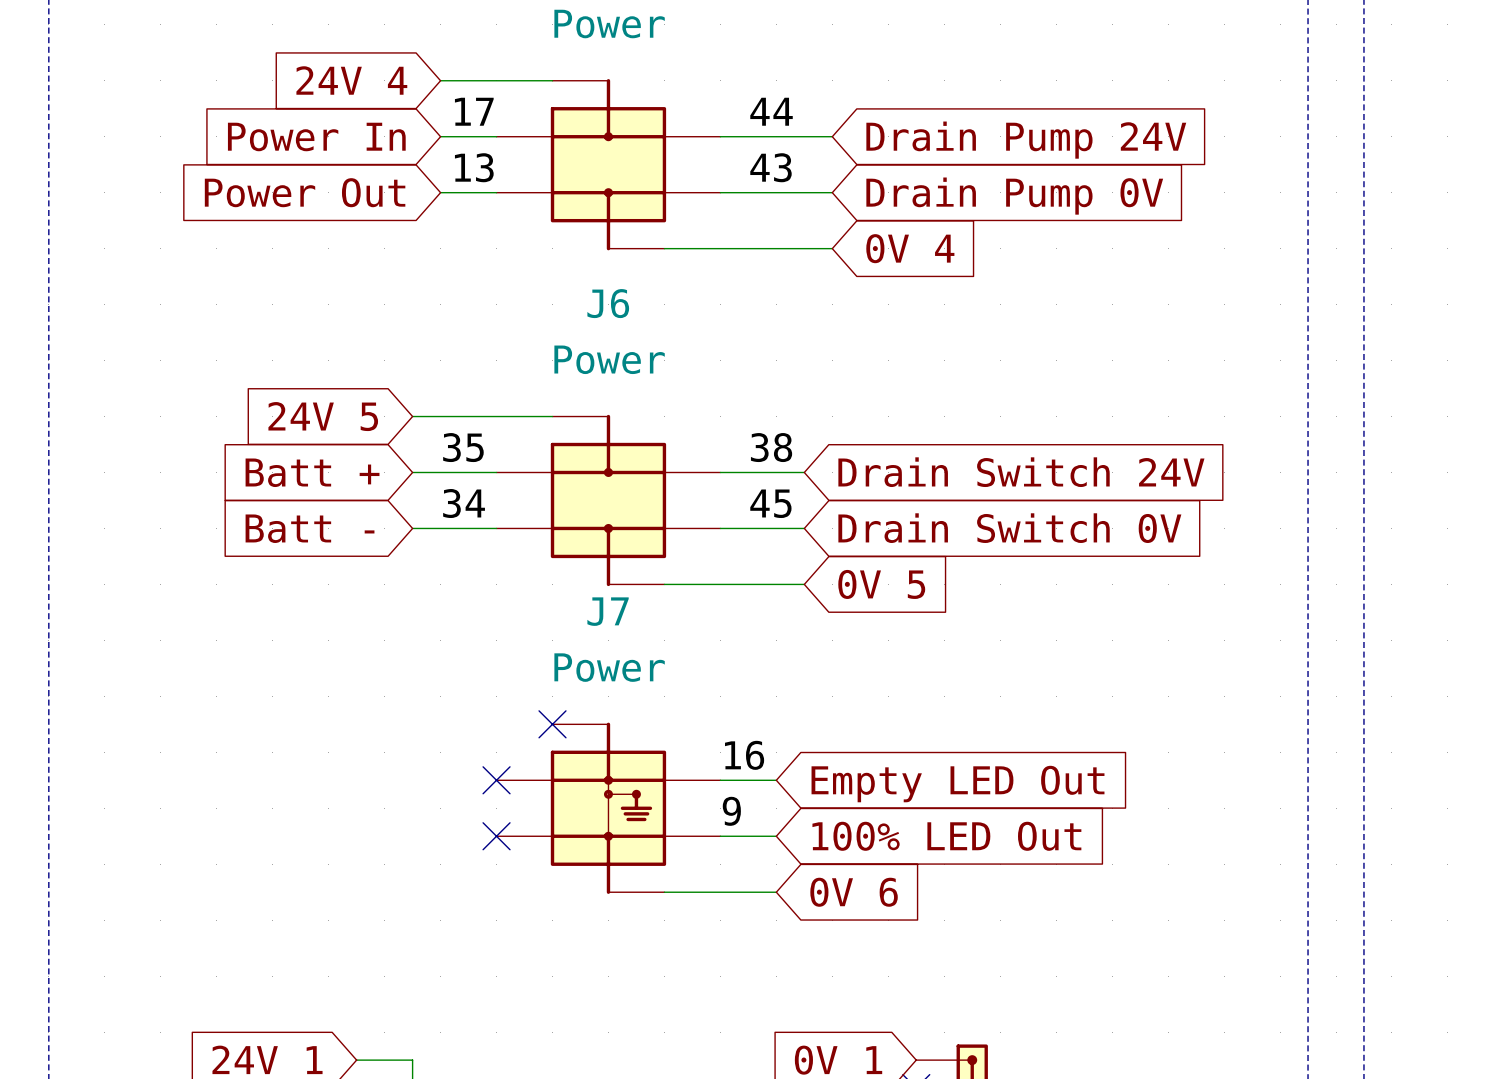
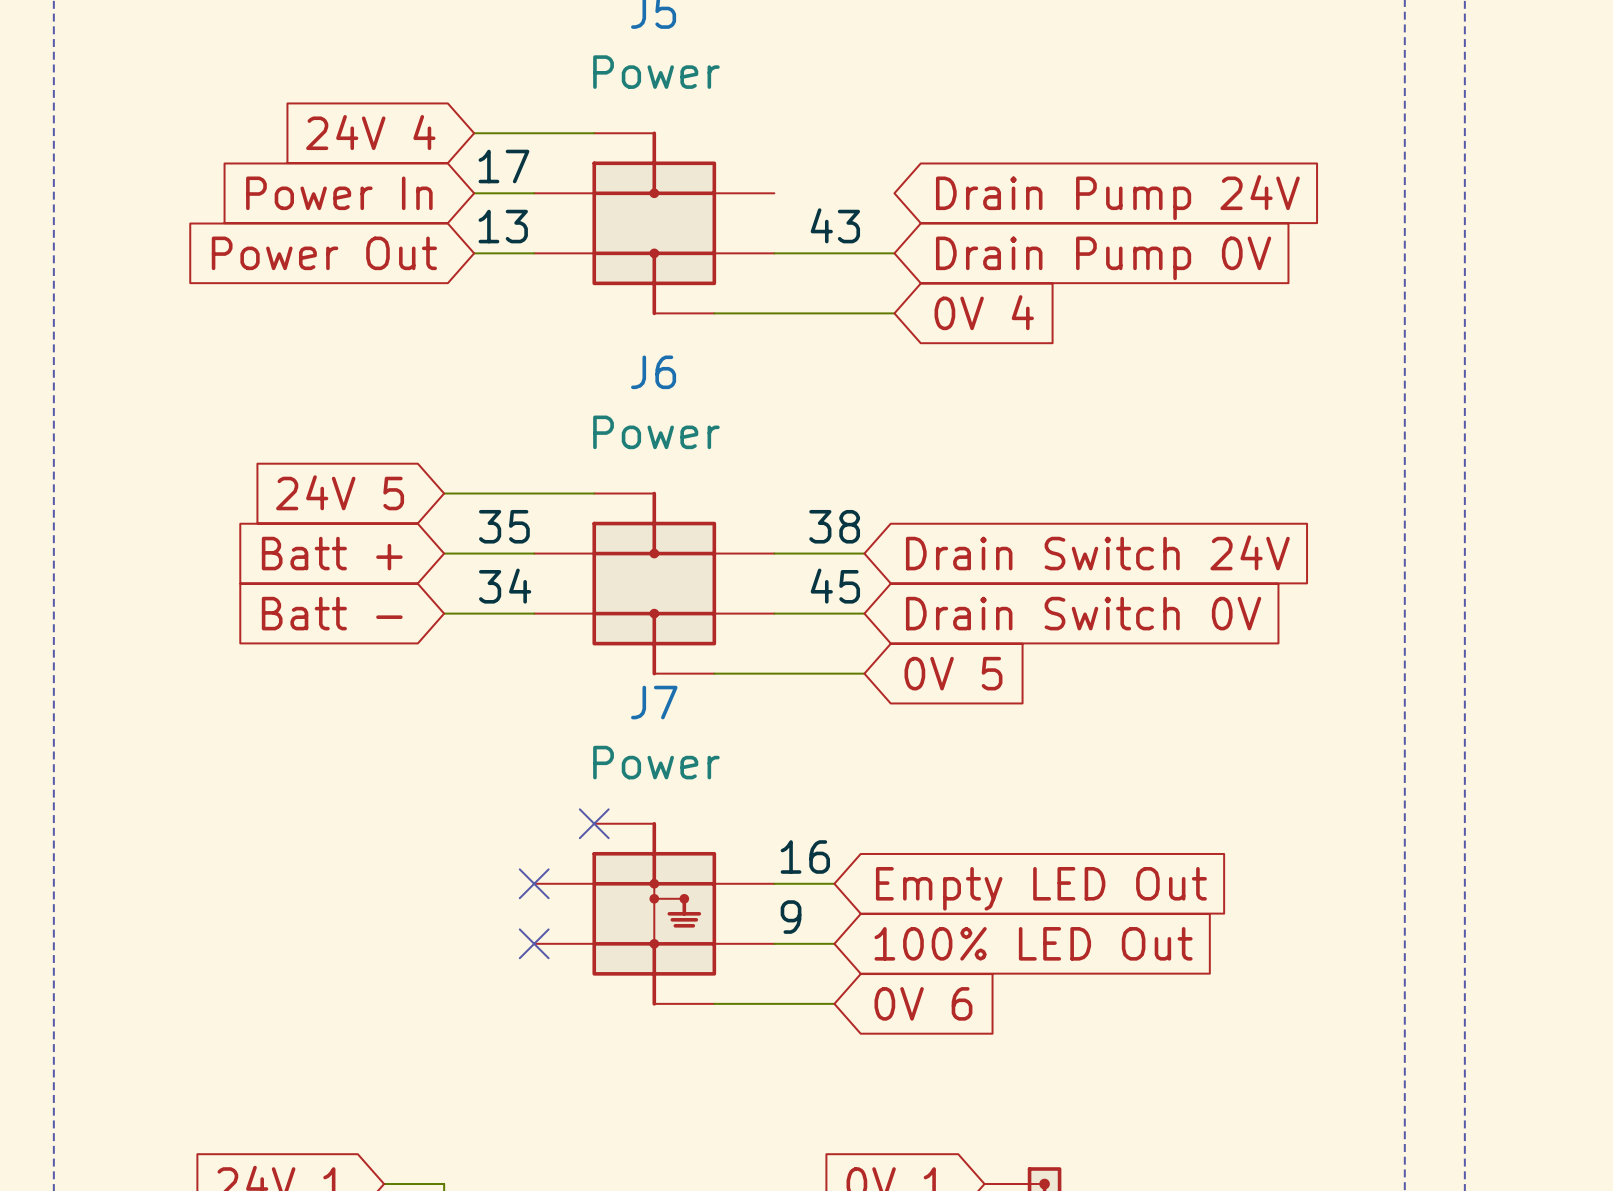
label: 44 (771, 111) -> none
wire: (720, 136) (832, 136) -> none

